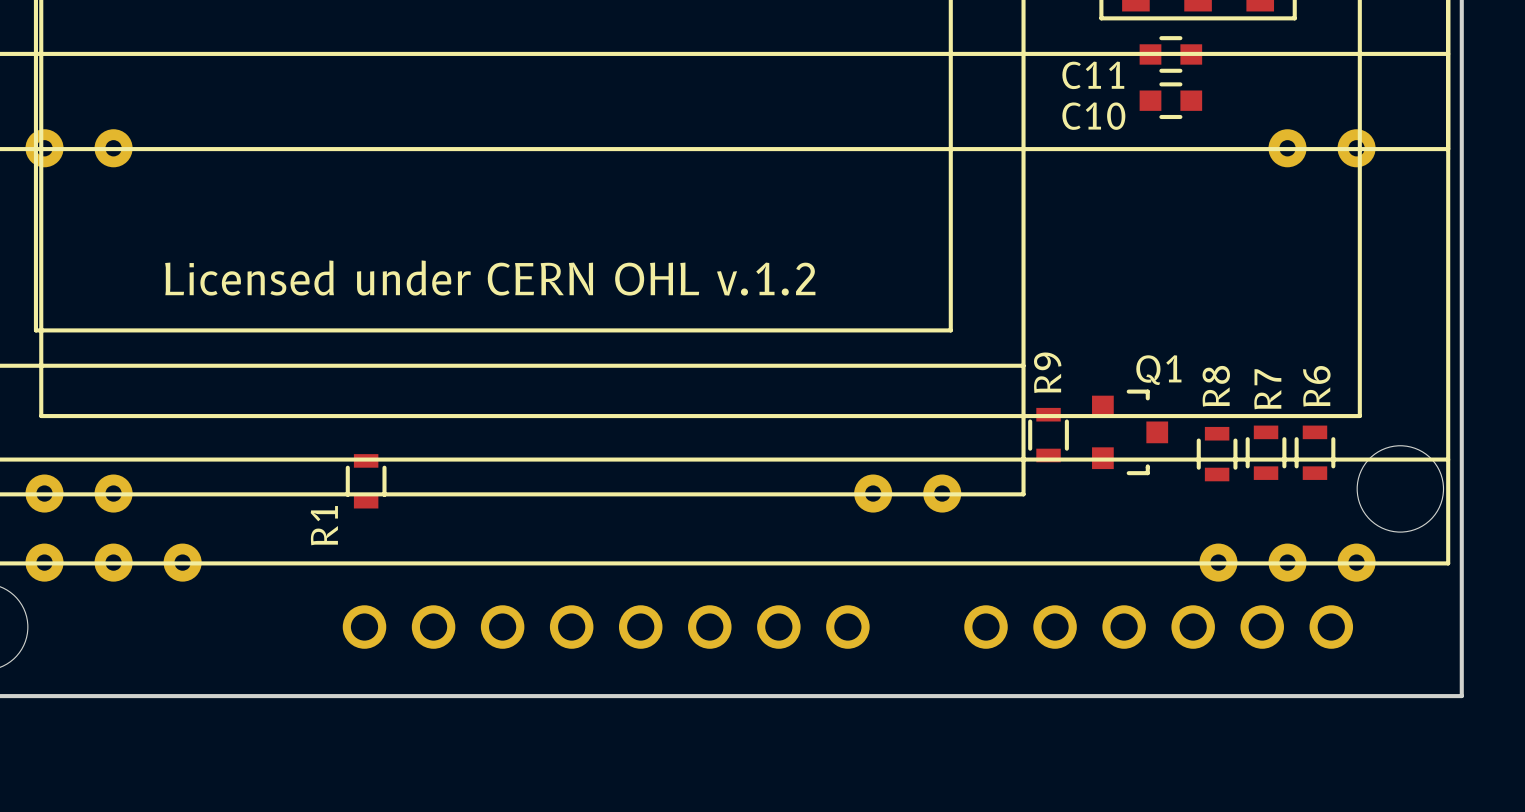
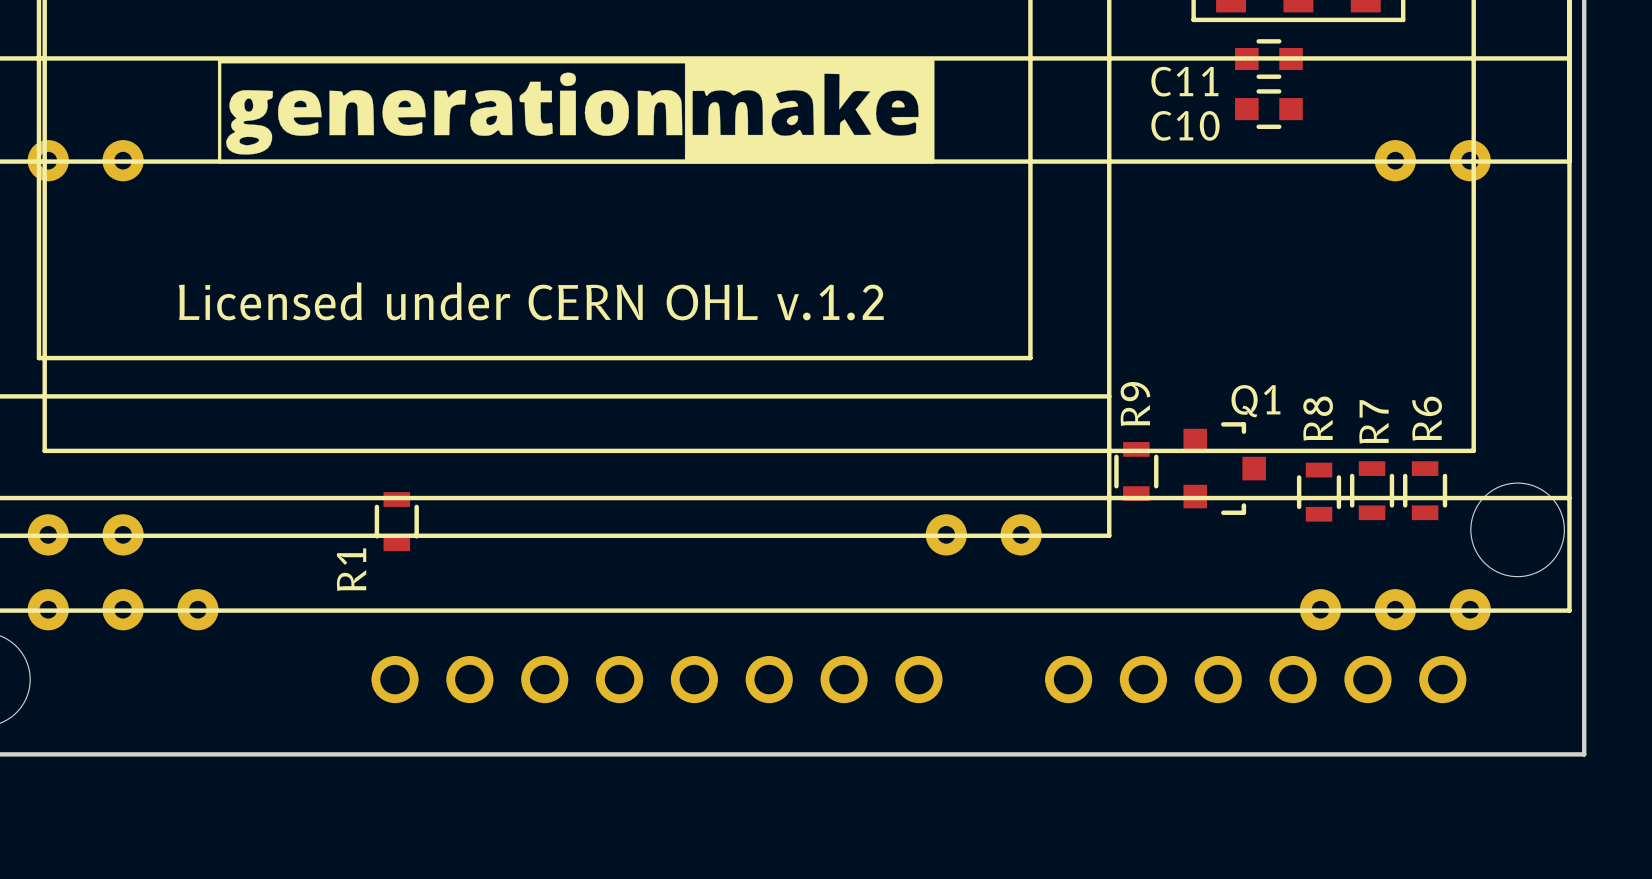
drawing: none -> [217, 59, 935, 164]

